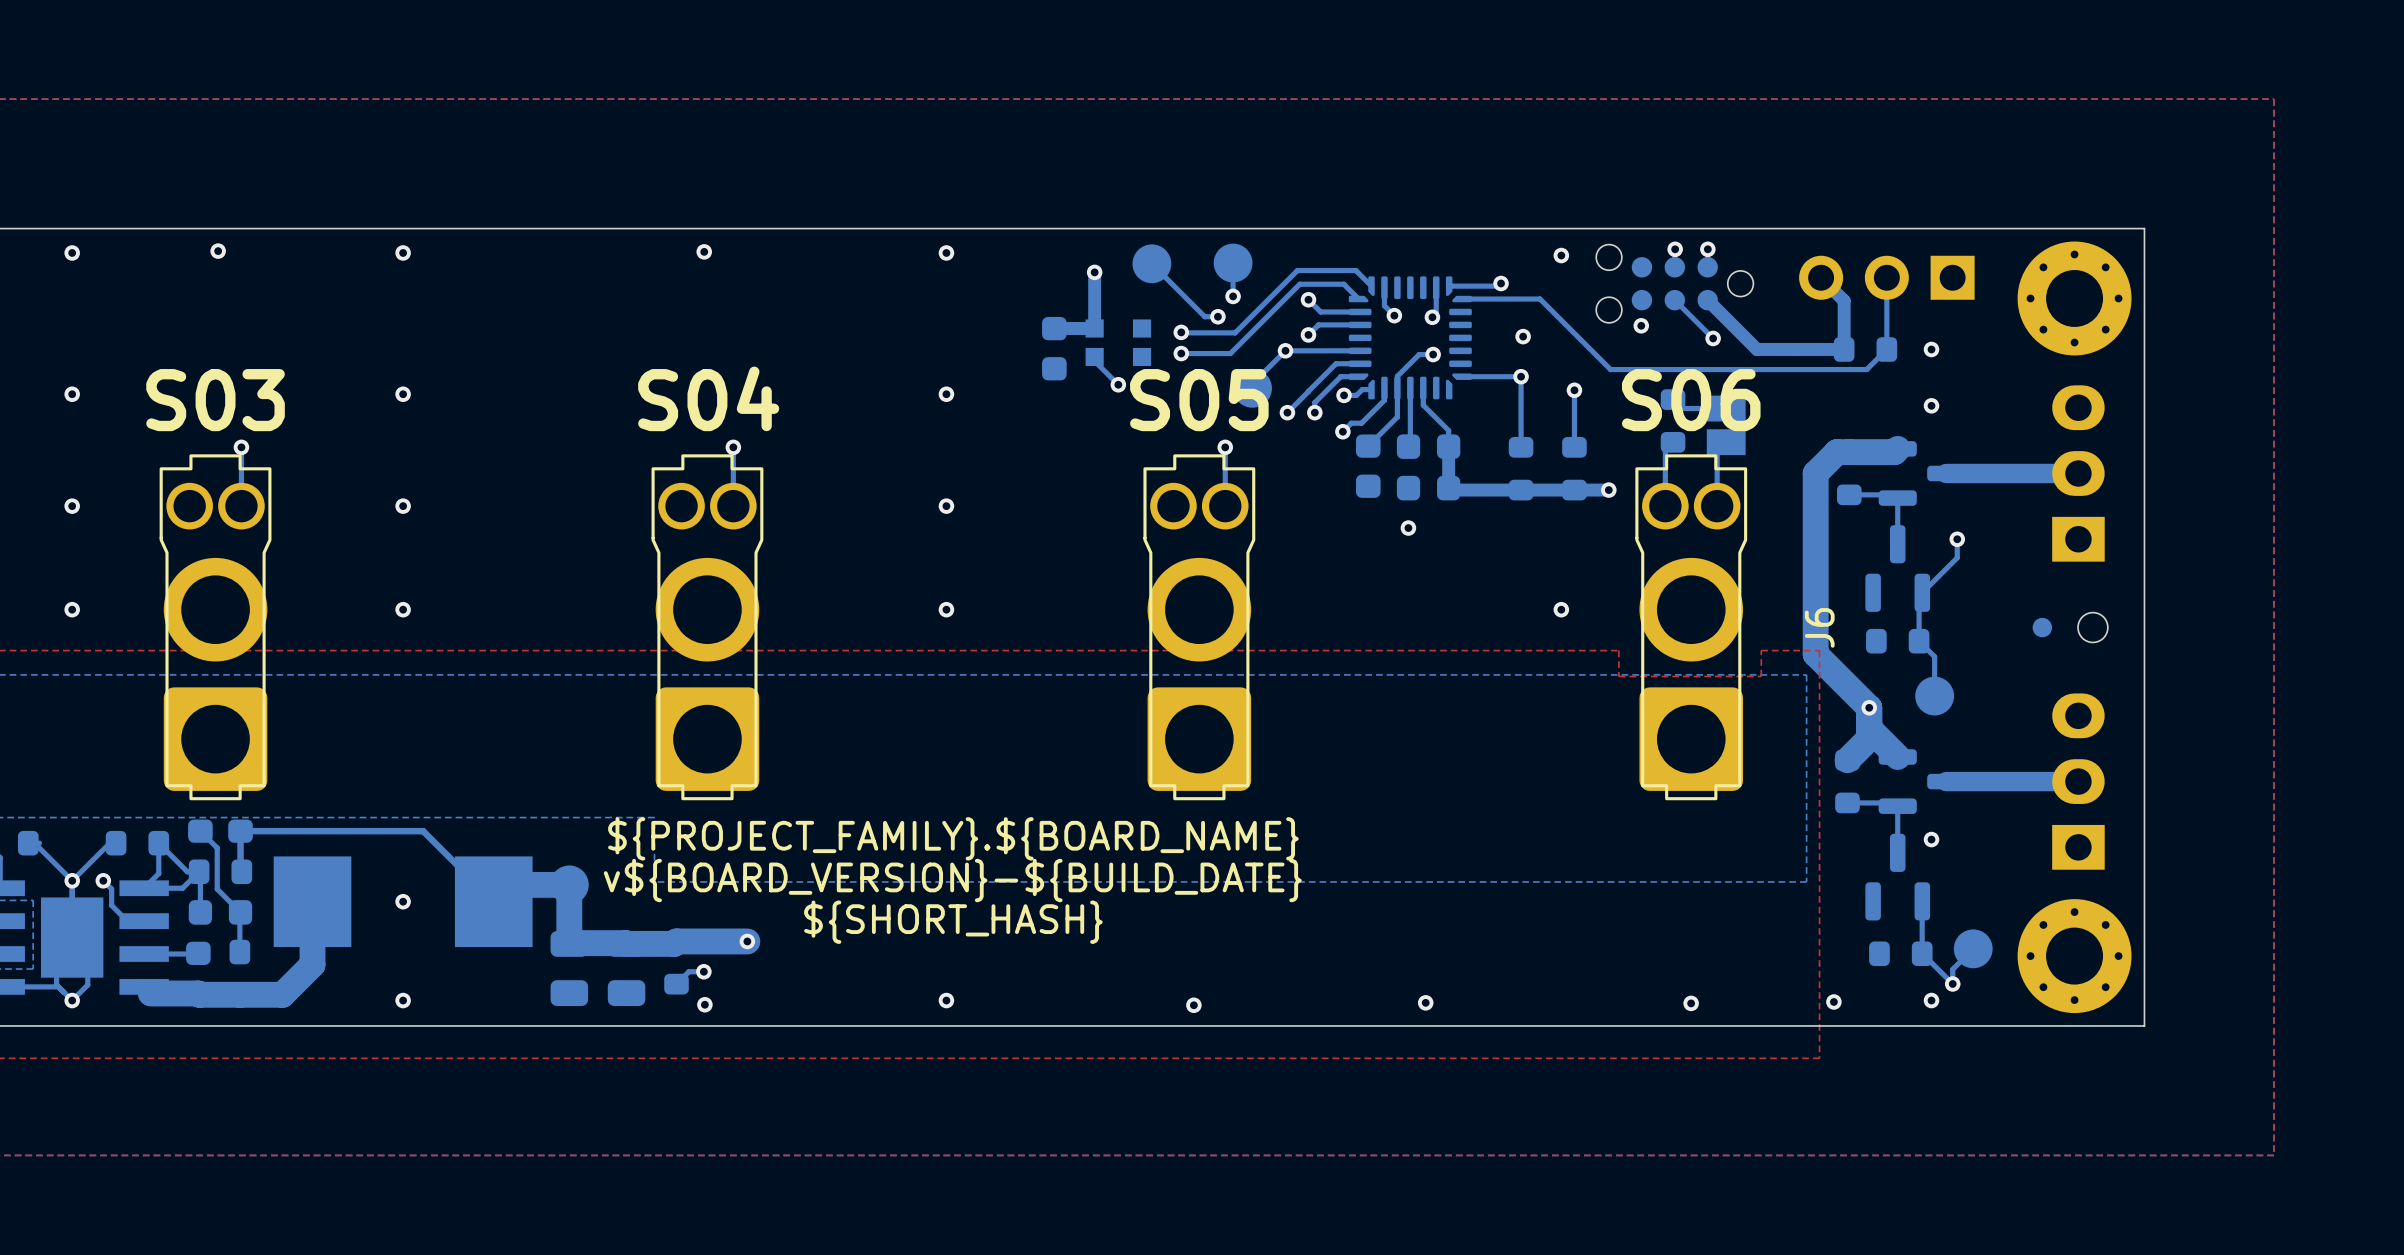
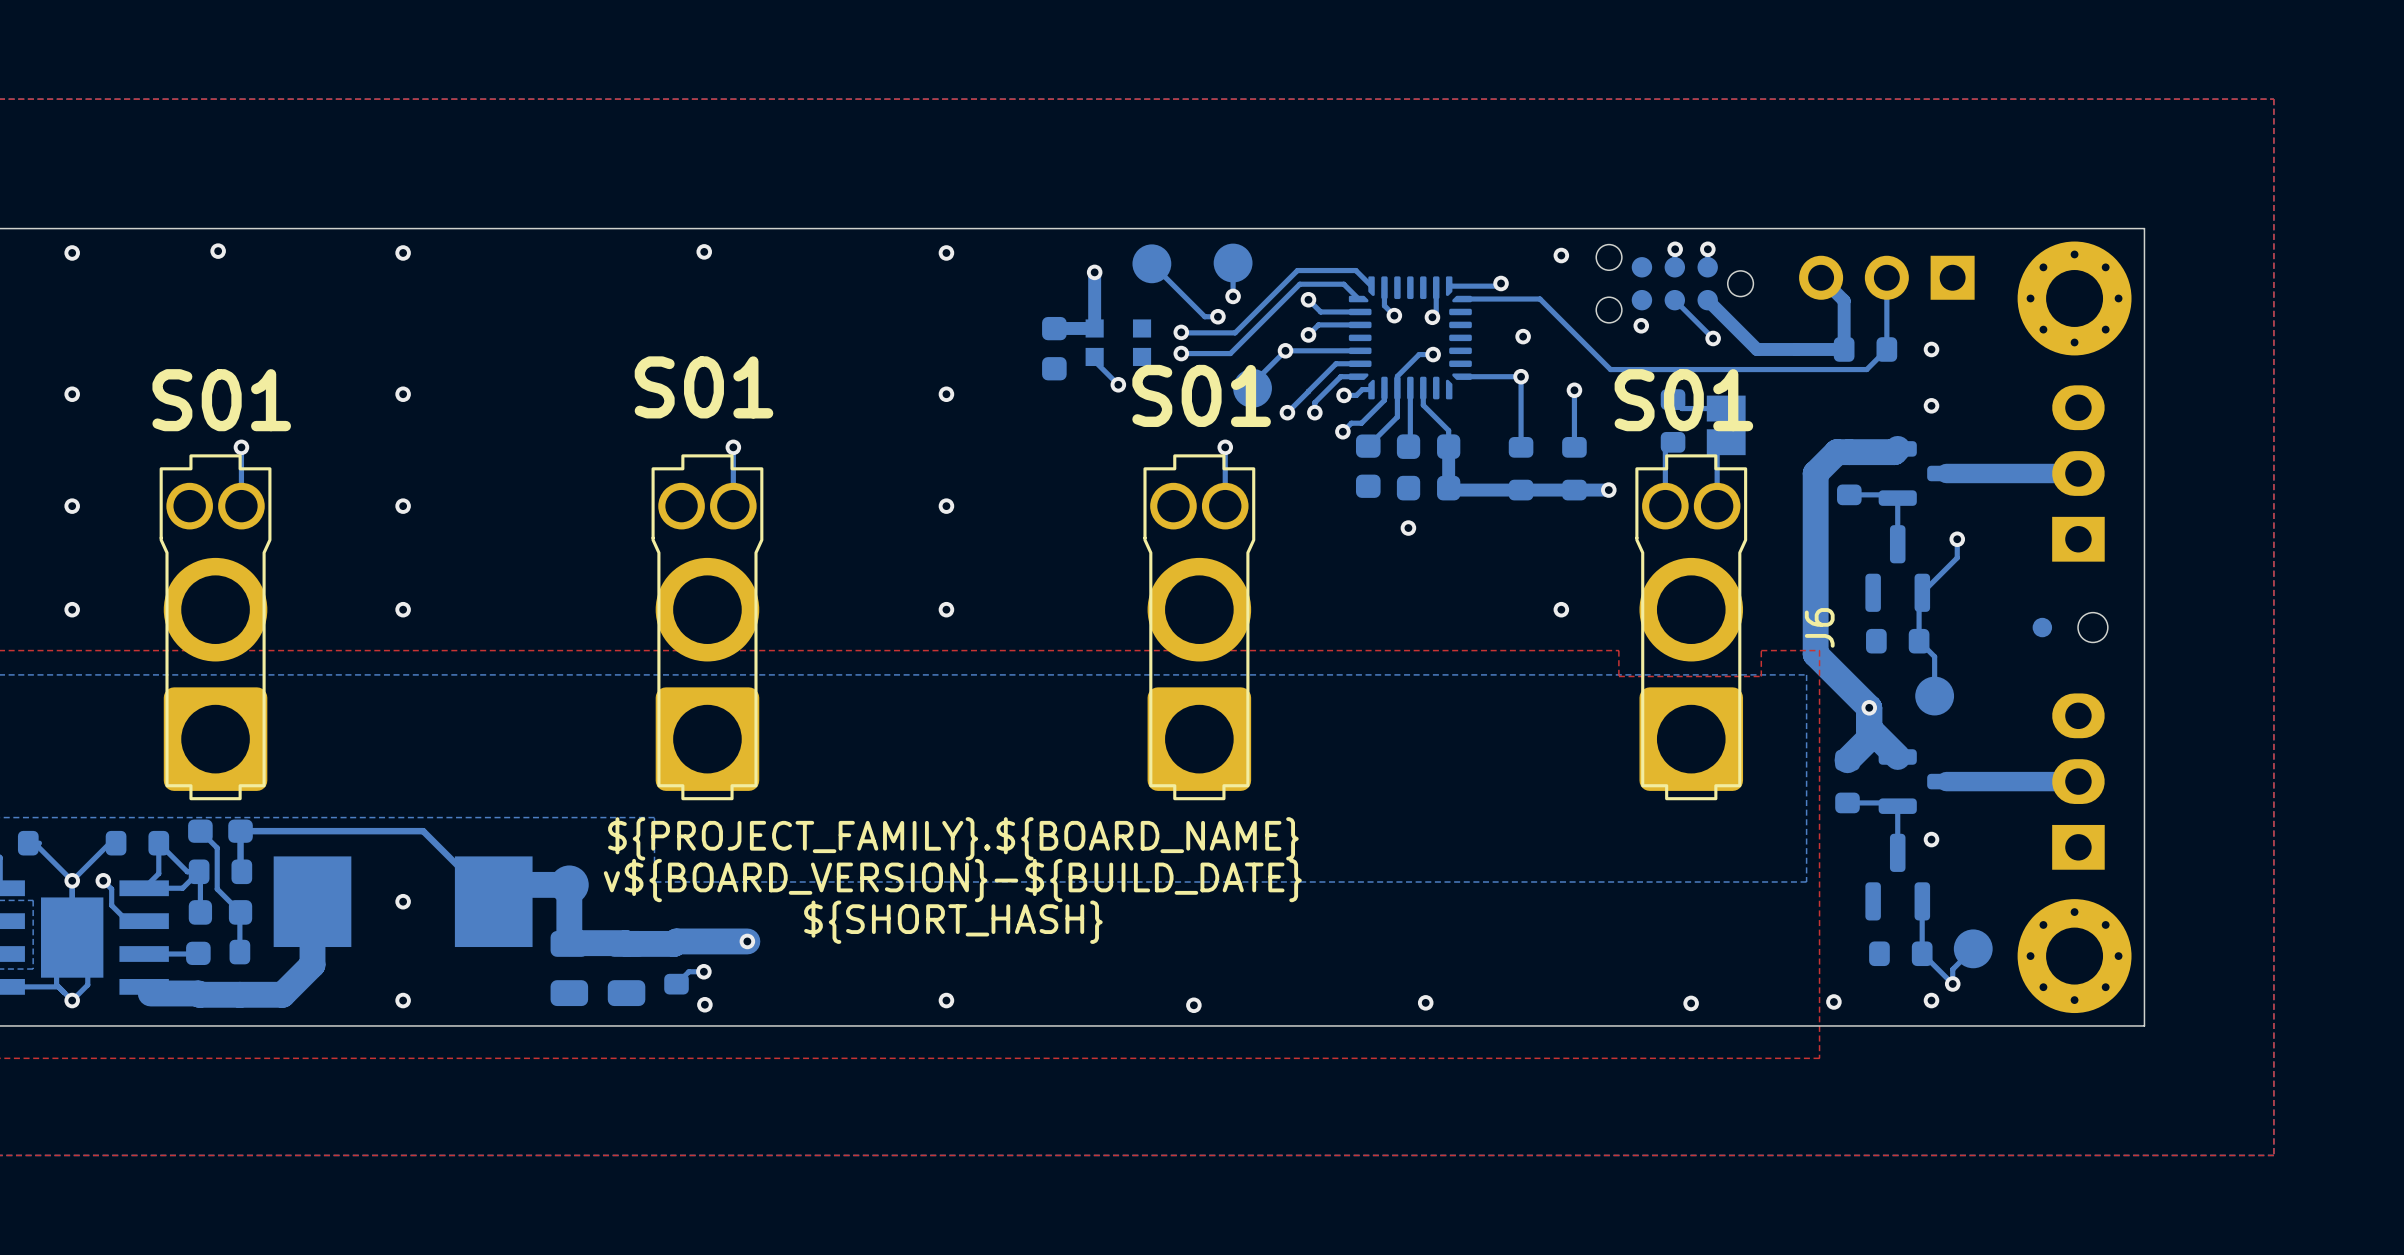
text: S04 (708, 398) -> S01 (703, 387)
text: S03 (215, 400) -> S01 (221, 400)
text: S05 (1199, 400) -> S01 (1201, 395)
text: S06 (1691, 400) -> S01 (1683, 400)

